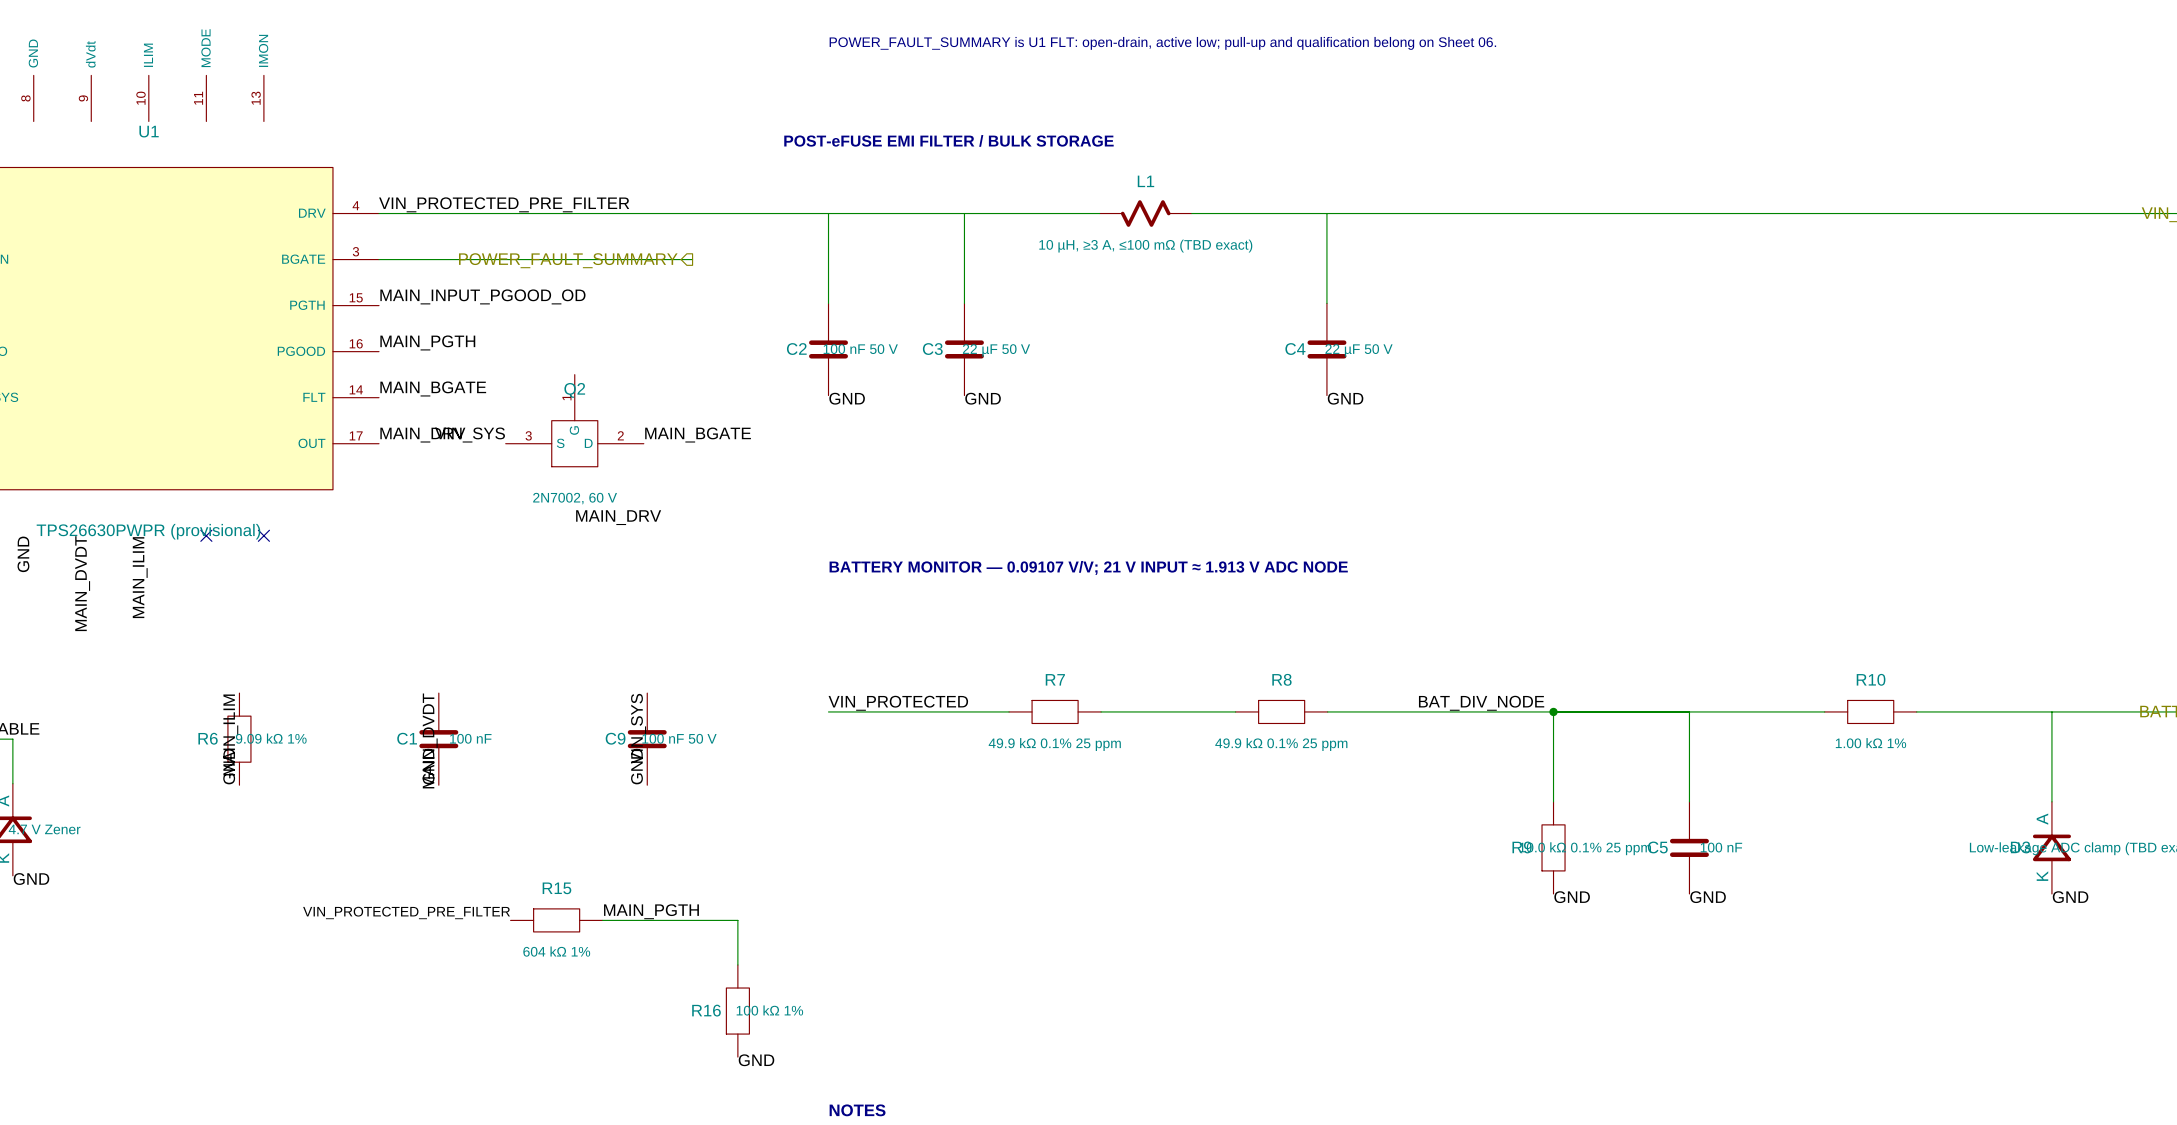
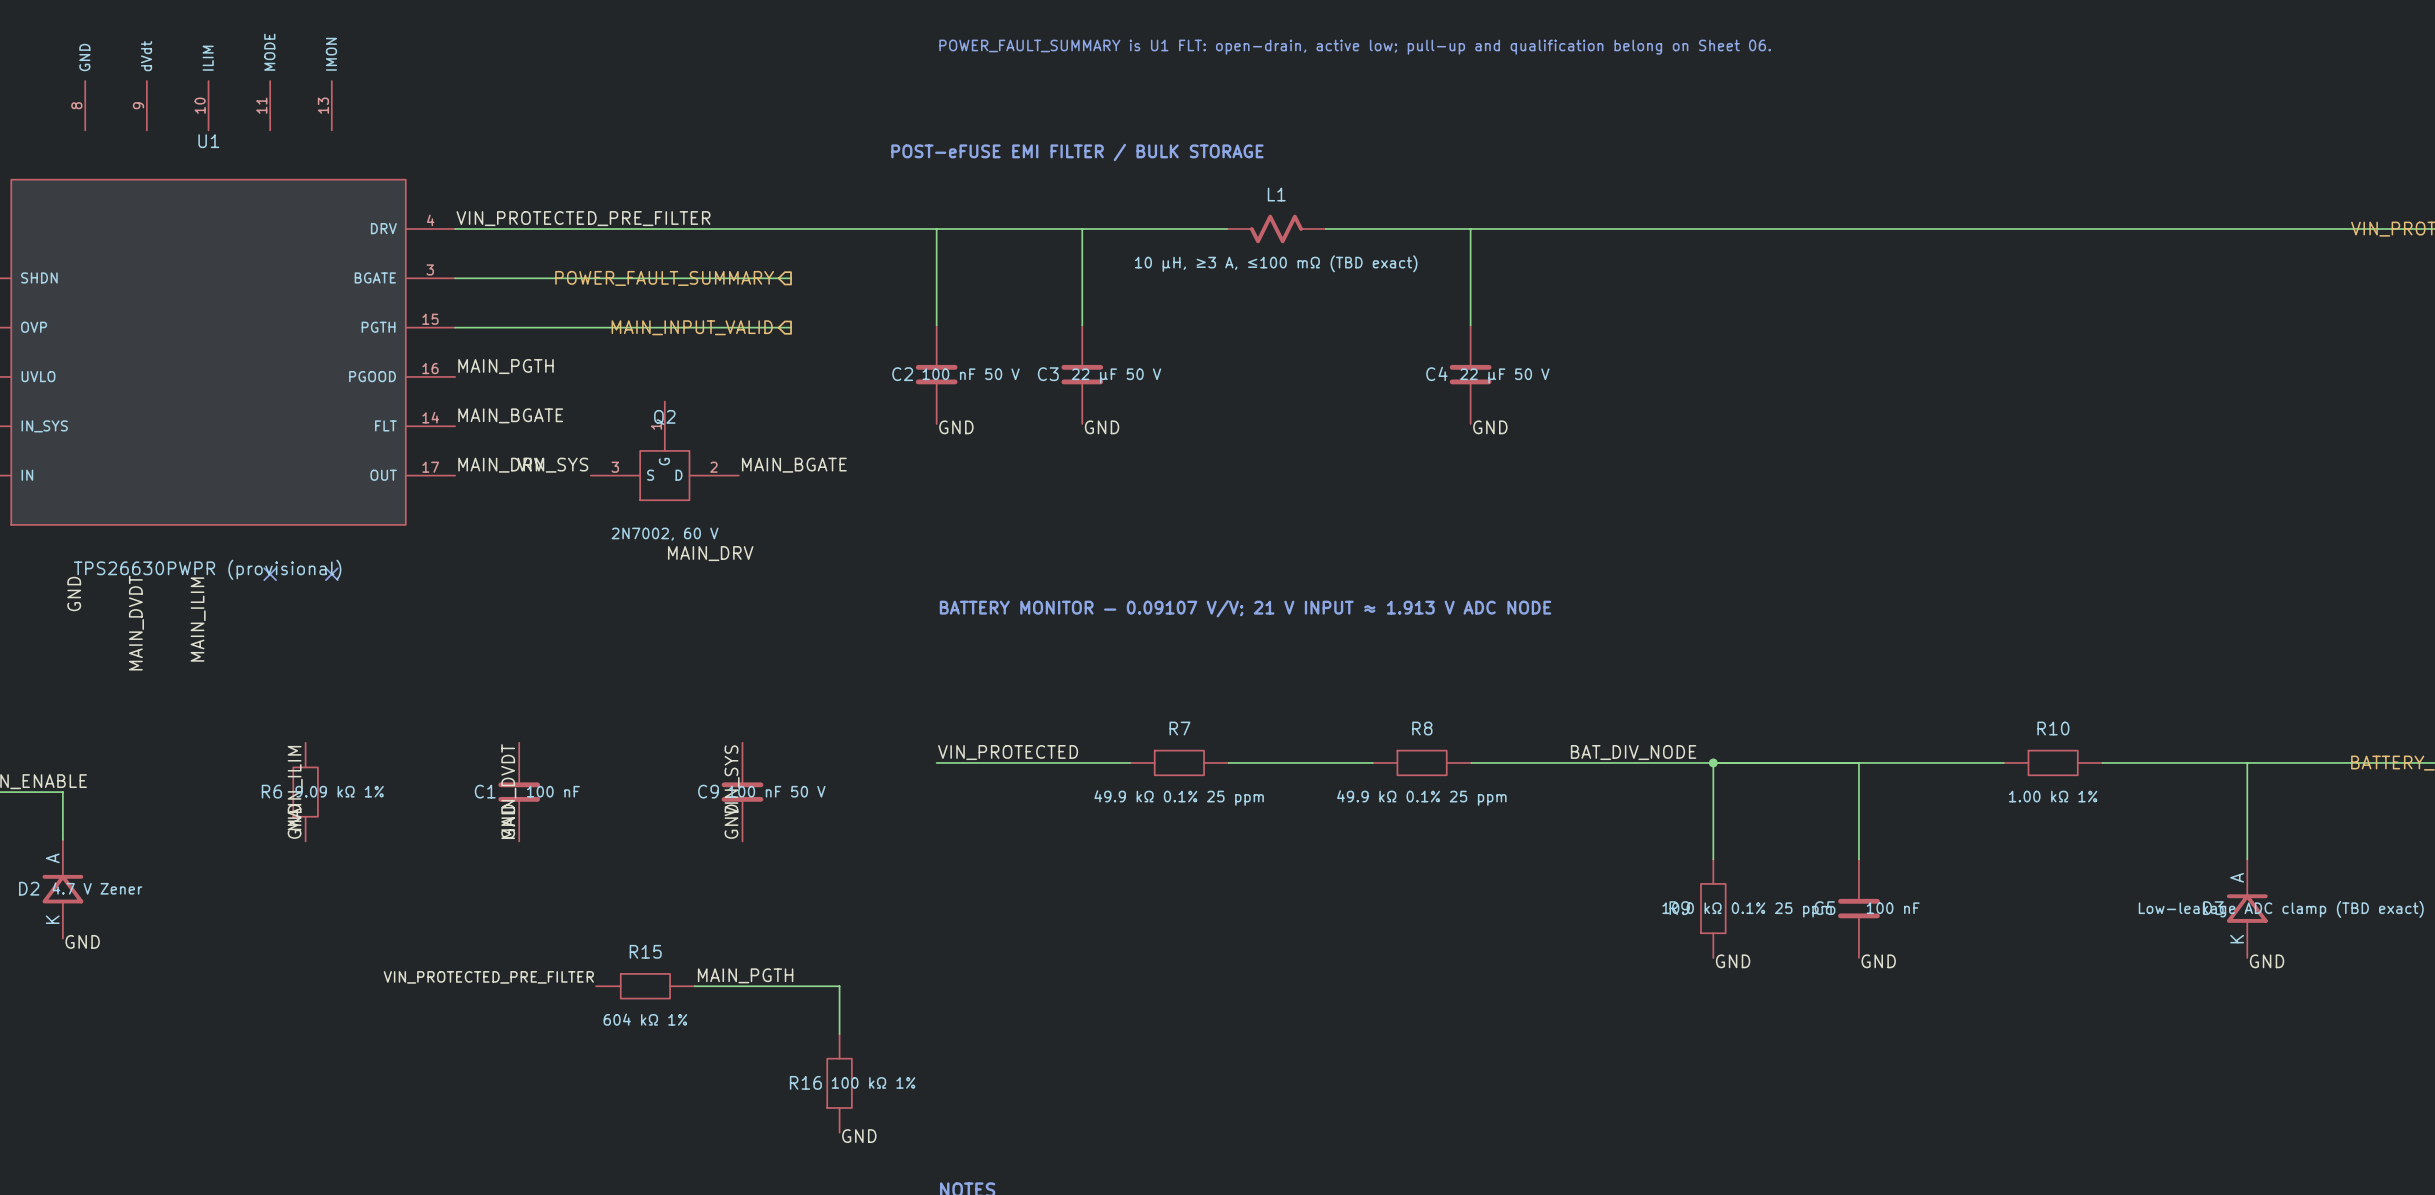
label: MAIN_INPUT_PGOOD_OD (482, 296) -> none
wire: none -> (455, 327) (791, 327)
hierarchical label: none -> MAIN_INPUT_VALID (692, 327)

